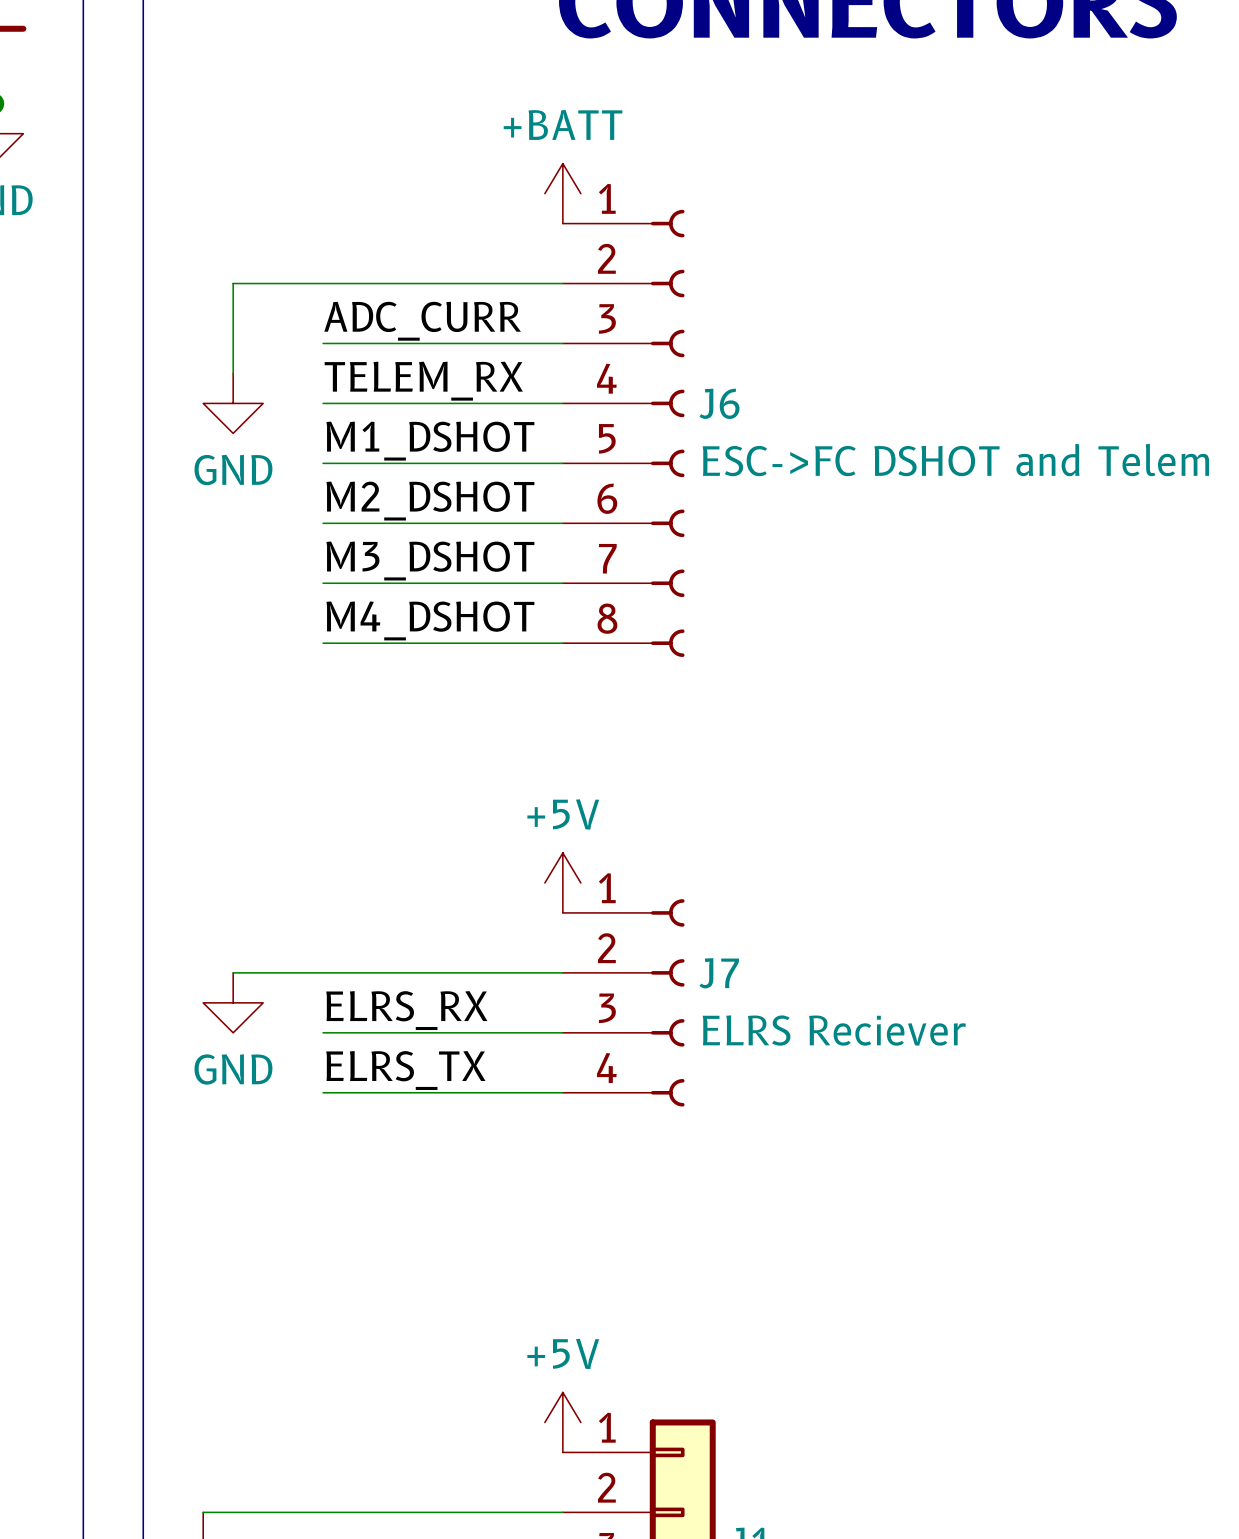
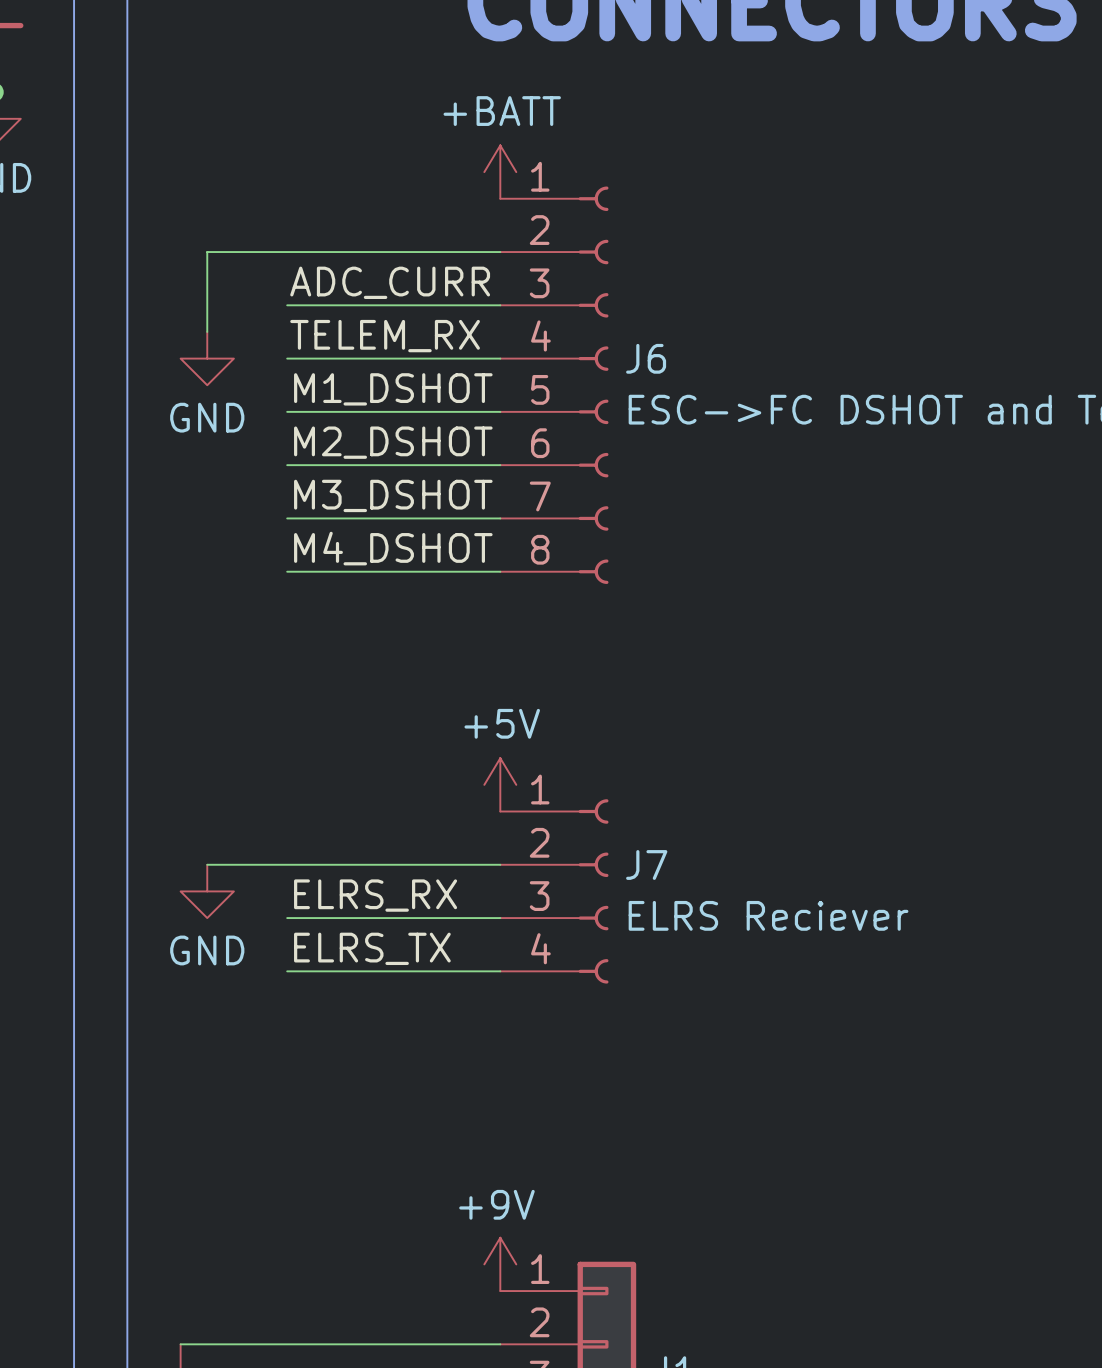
power symbol: +5V (562, 1422) -> +9V (500, 1264)

